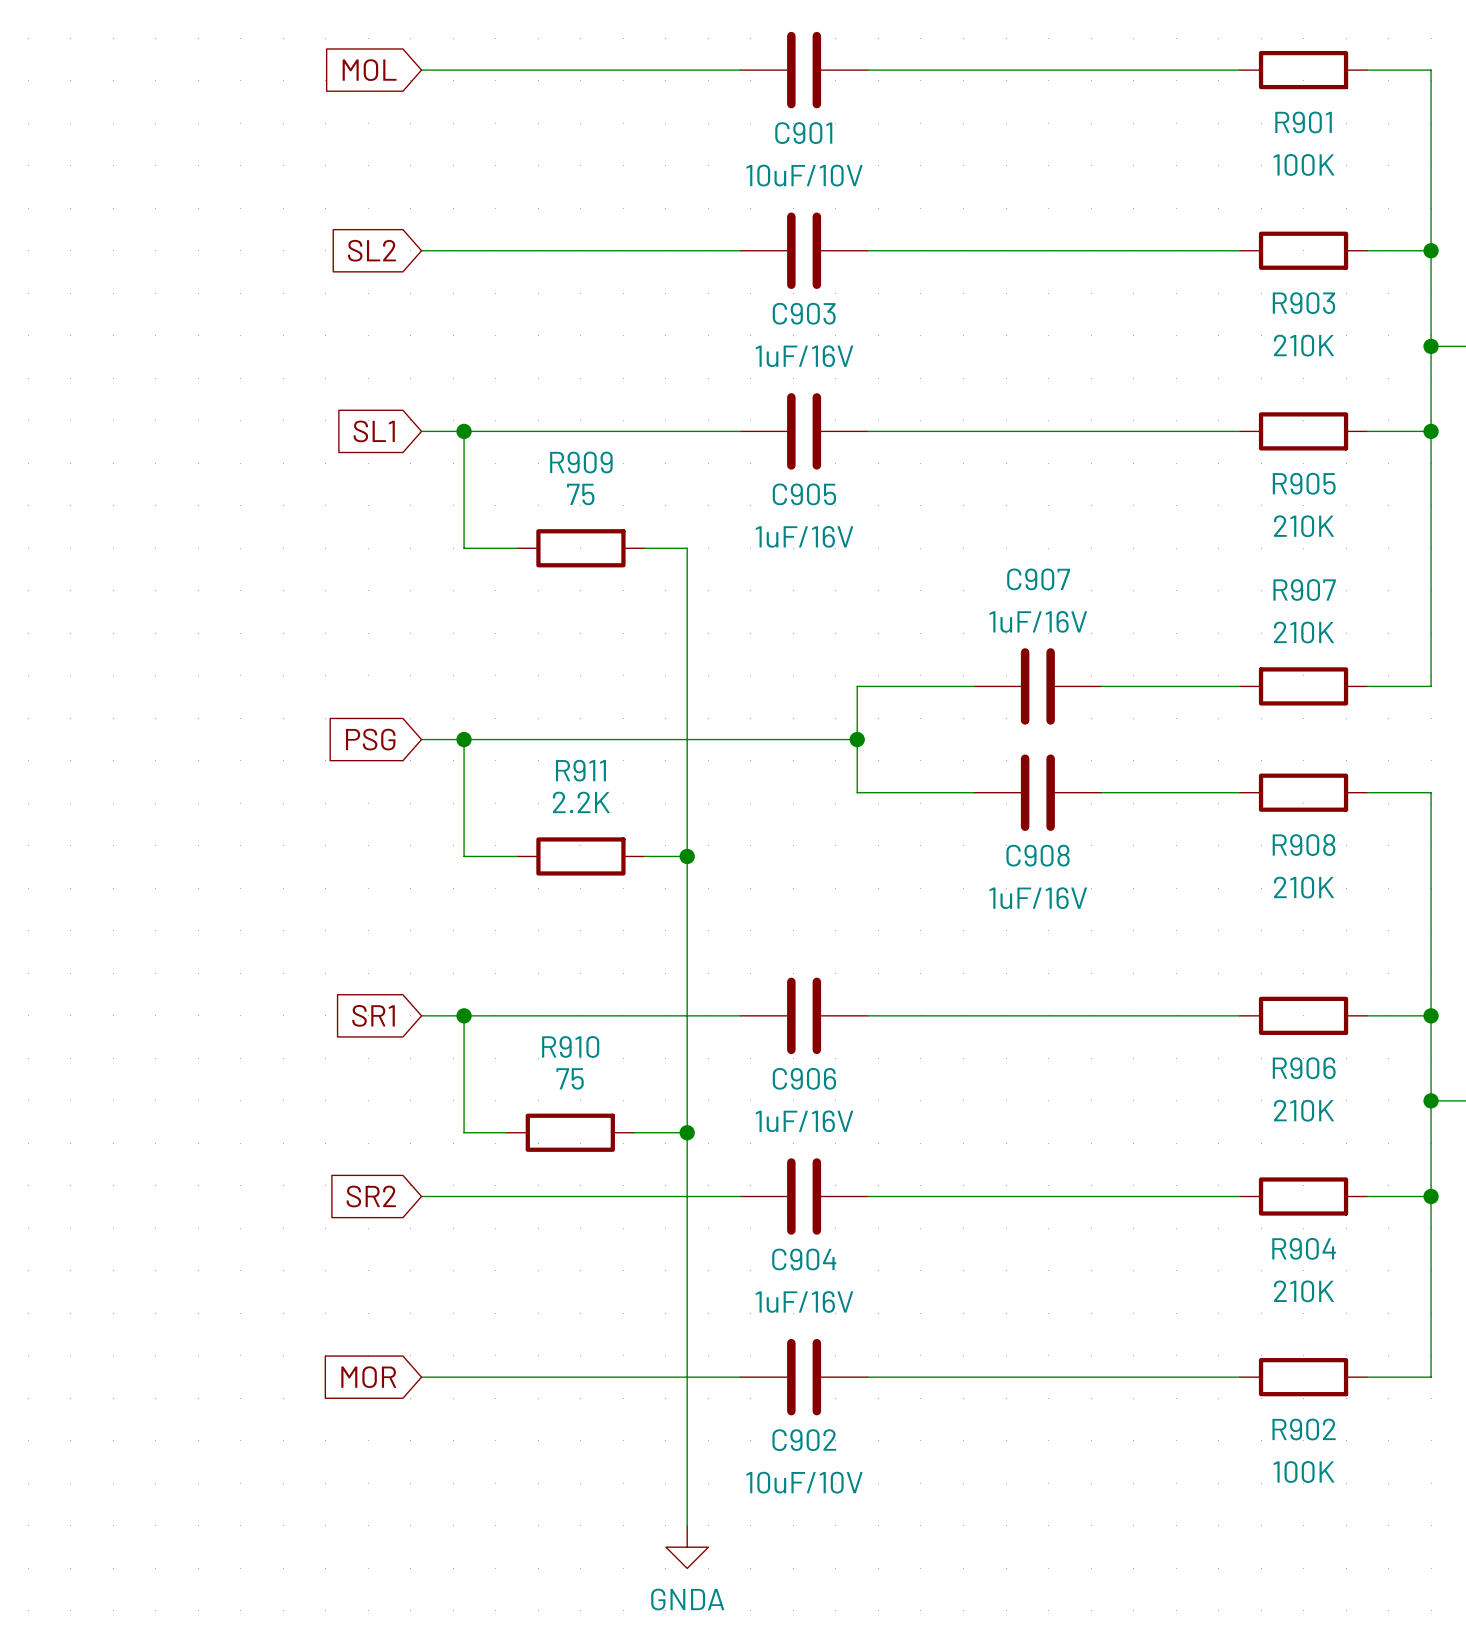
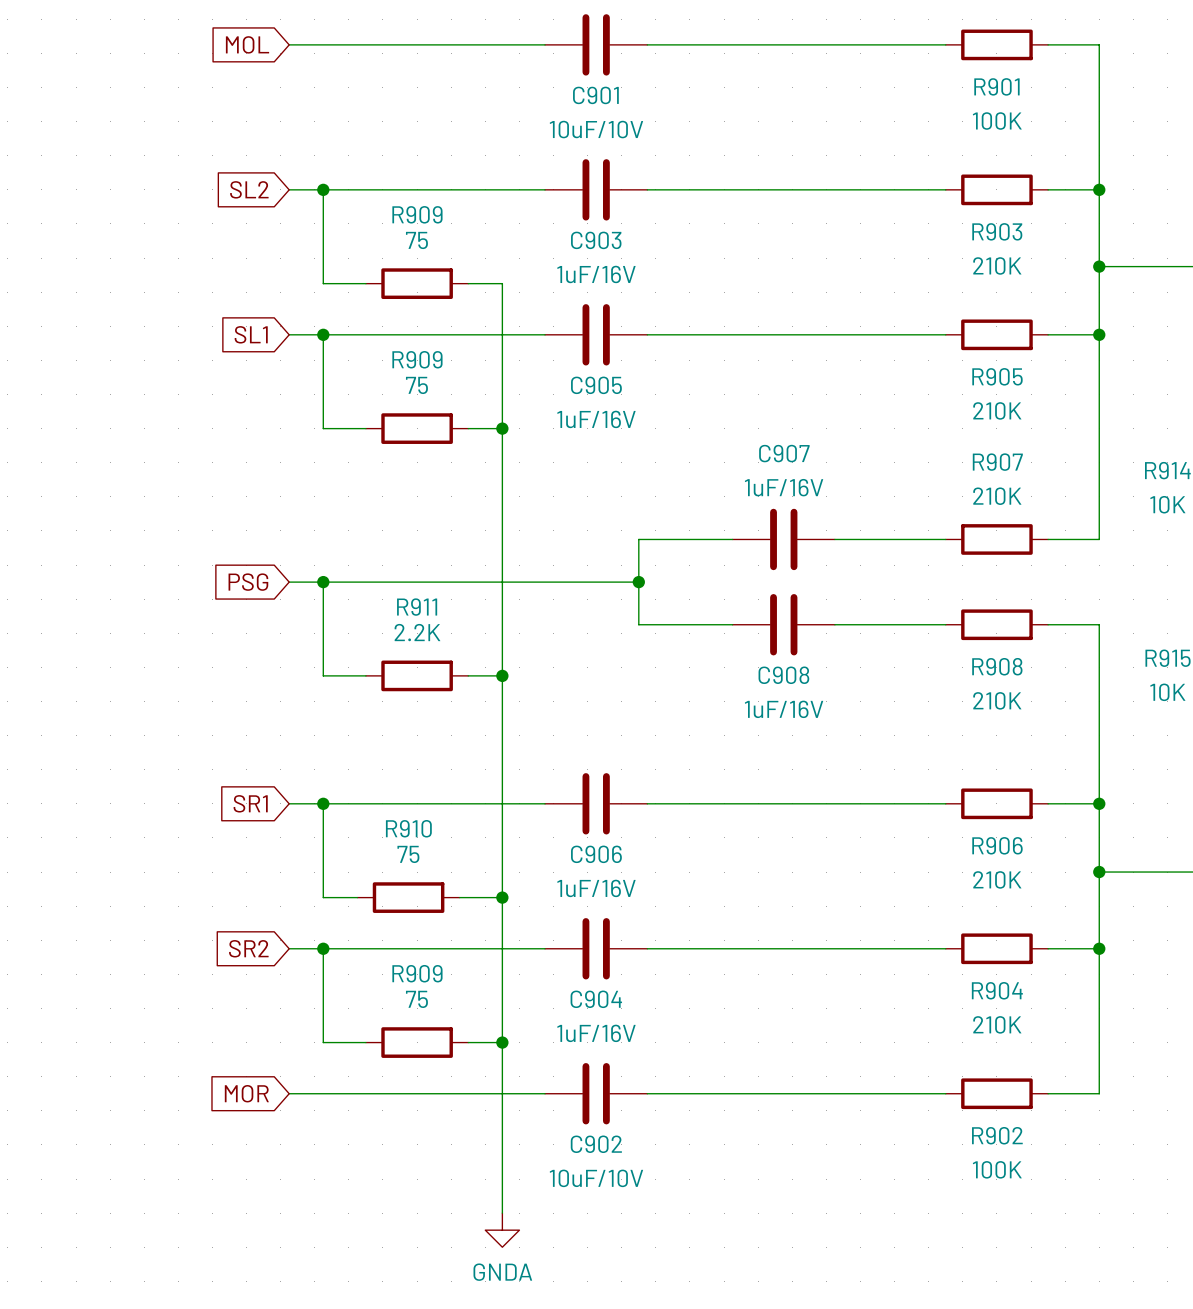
wire: none -> (323, 189) (323, 283) (365, 283)
junction: none -> (323, 189)
R909: none -> 75 (417, 283)
wire: none -> (468, 283) (502, 283) (502, 428)
junction: none -> (502, 428)
wire: none -> (323, 948) (323, 1042) (365, 1042)
junction: none -> (323, 948)
R909: none -> 75 (417, 1042)
wire: none -> (468, 1042) (502, 1042)
junction: none -> (502, 1042)

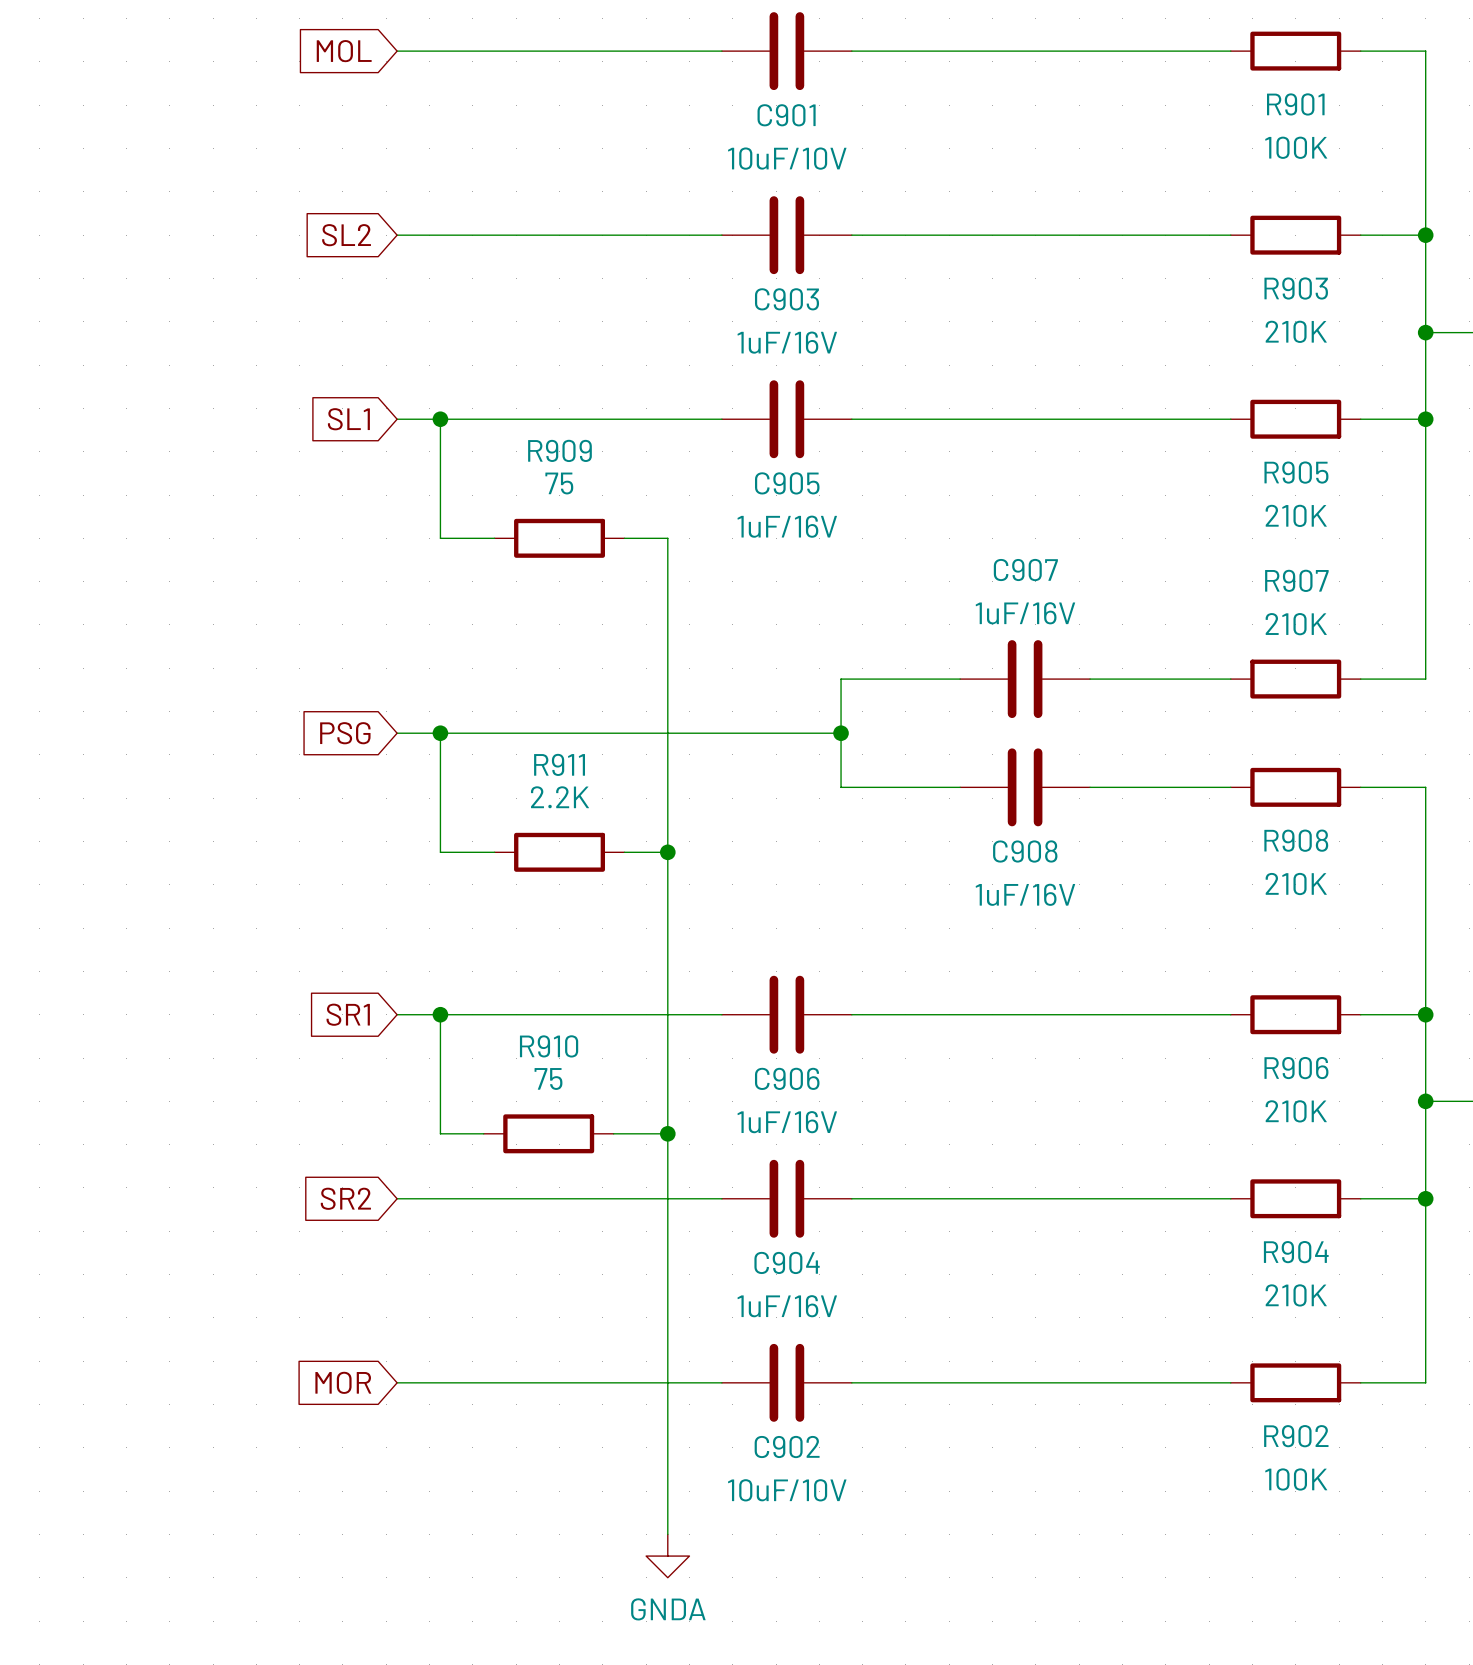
wire: (323, 189) (323, 283) (365, 283) -> none
junction: (323, 189) -> none
R909: 75 (417, 283) -> none
wire: (468, 283) (502, 283) (502, 428) -> none
junction: (502, 428) -> none
wire: (323, 948) (323, 1042) (365, 1042) -> none
junction: (323, 948) -> none
R909: 75 (417, 1042) -> none
wire: (468, 1042) (502, 1042) -> none
junction: (502, 1042) -> none

